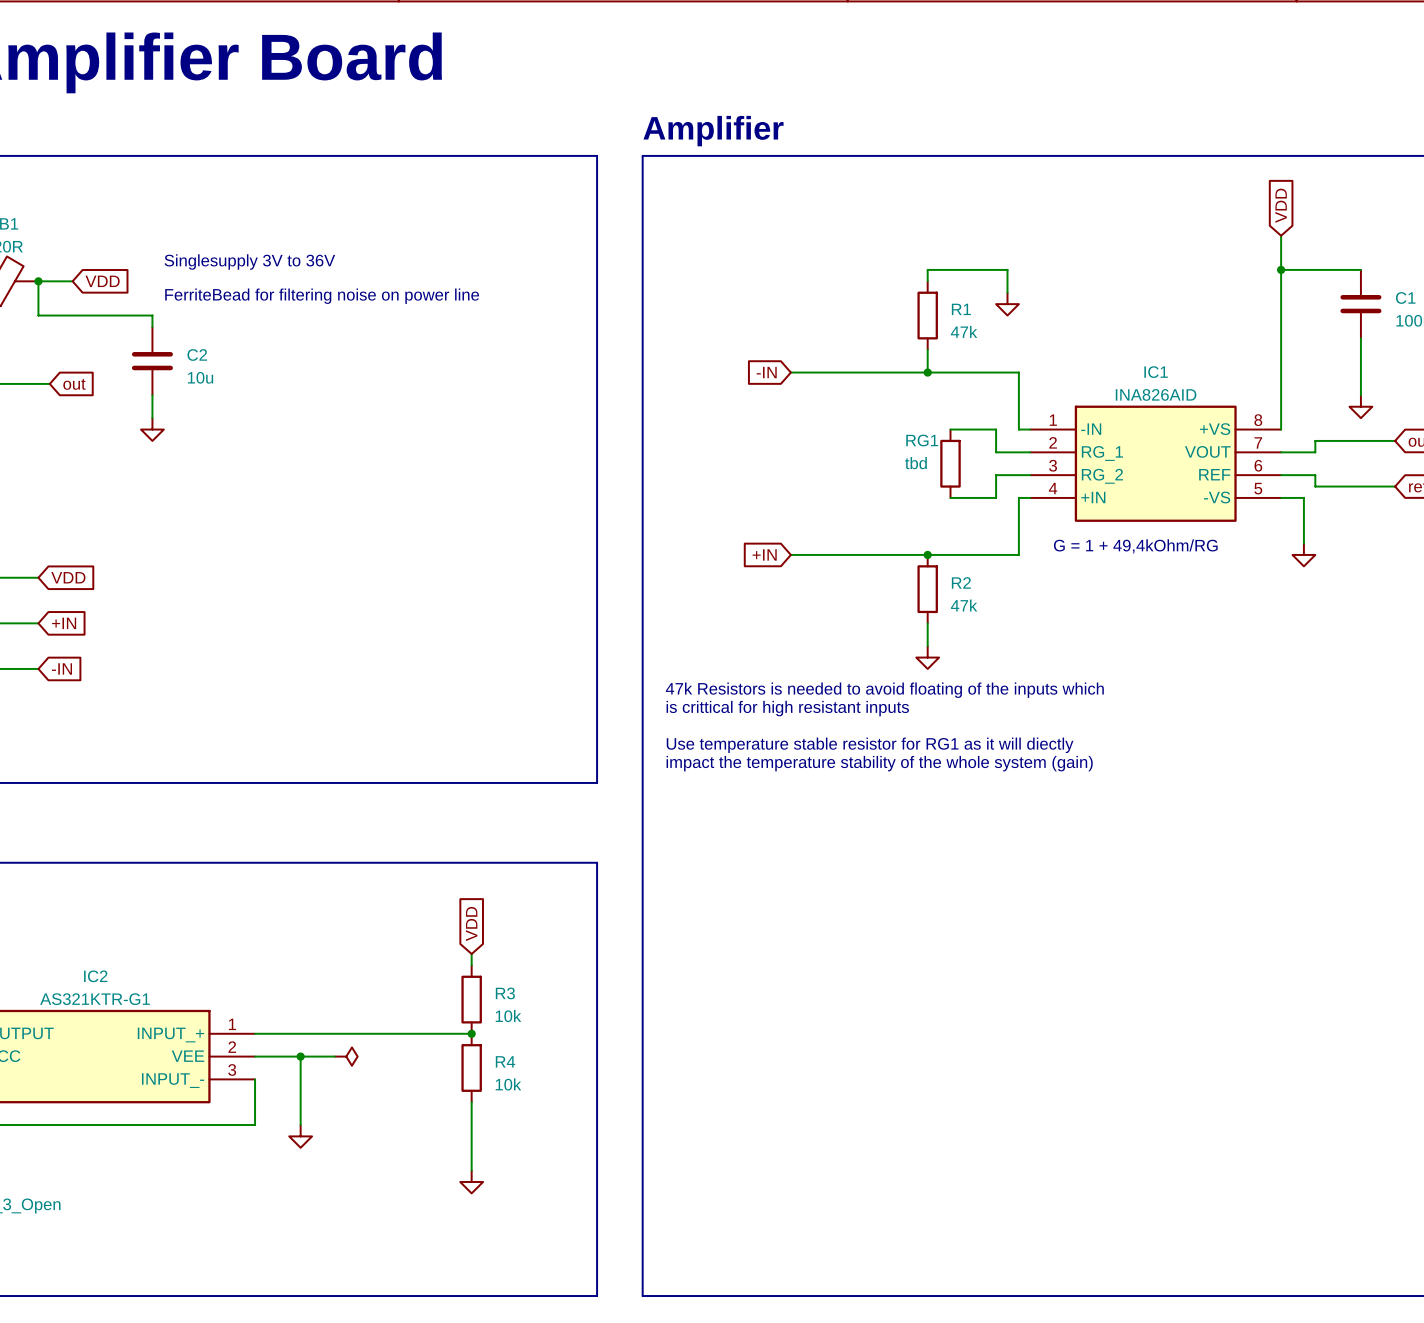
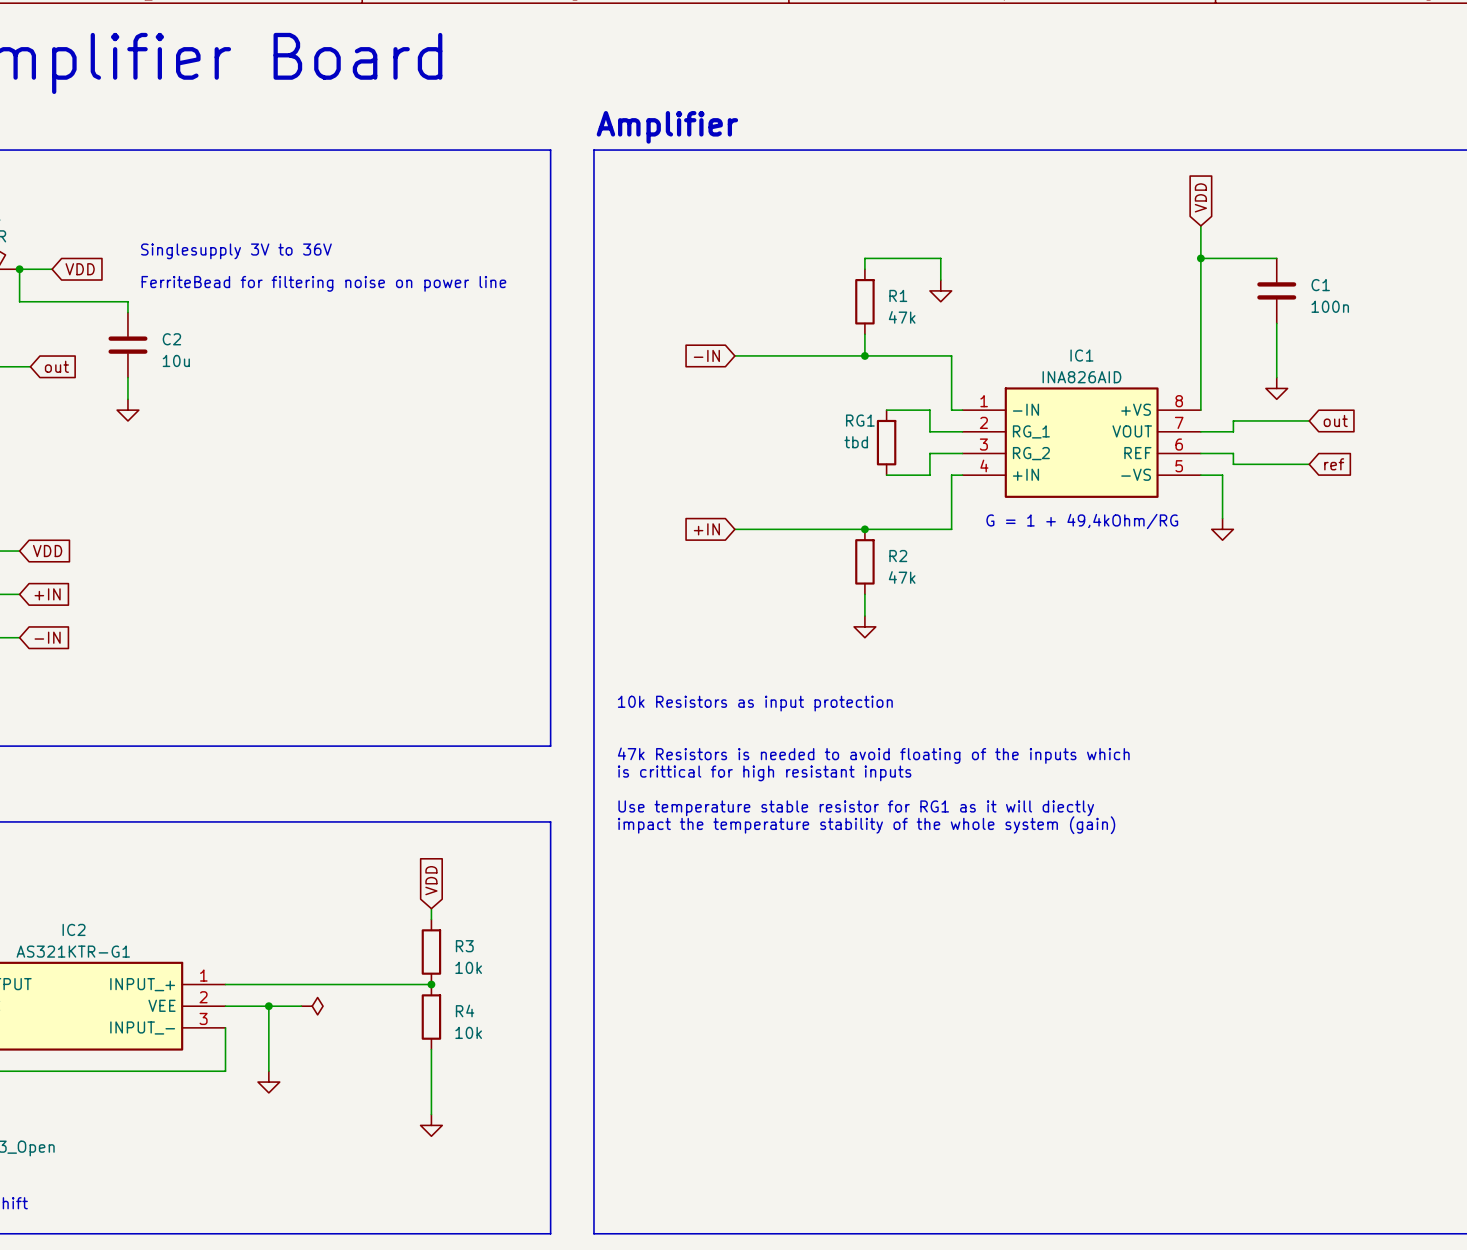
text position: 47k Resistors is needed to avoid floating of the inputs which (884, 690) -> 47k Resistors is needed to avoid floating of the inputs which (873, 755)
text position: is crittical for high resistant inputs (787, 708) -> is crittical for high resistant inputs (764, 773)
text: none -> 10k Resistors as input protection (755, 703)
text position: Use temperature stable resistor for RG1 as it will diectly (870, 745) -> Use temperature stable resistor for RG1 as it will diectly (856, 808)
text position: impact the temperature stability of the whole system (gain) (879, 763) -> impact the temperature stability of the whole system (gain) (866, 825)

